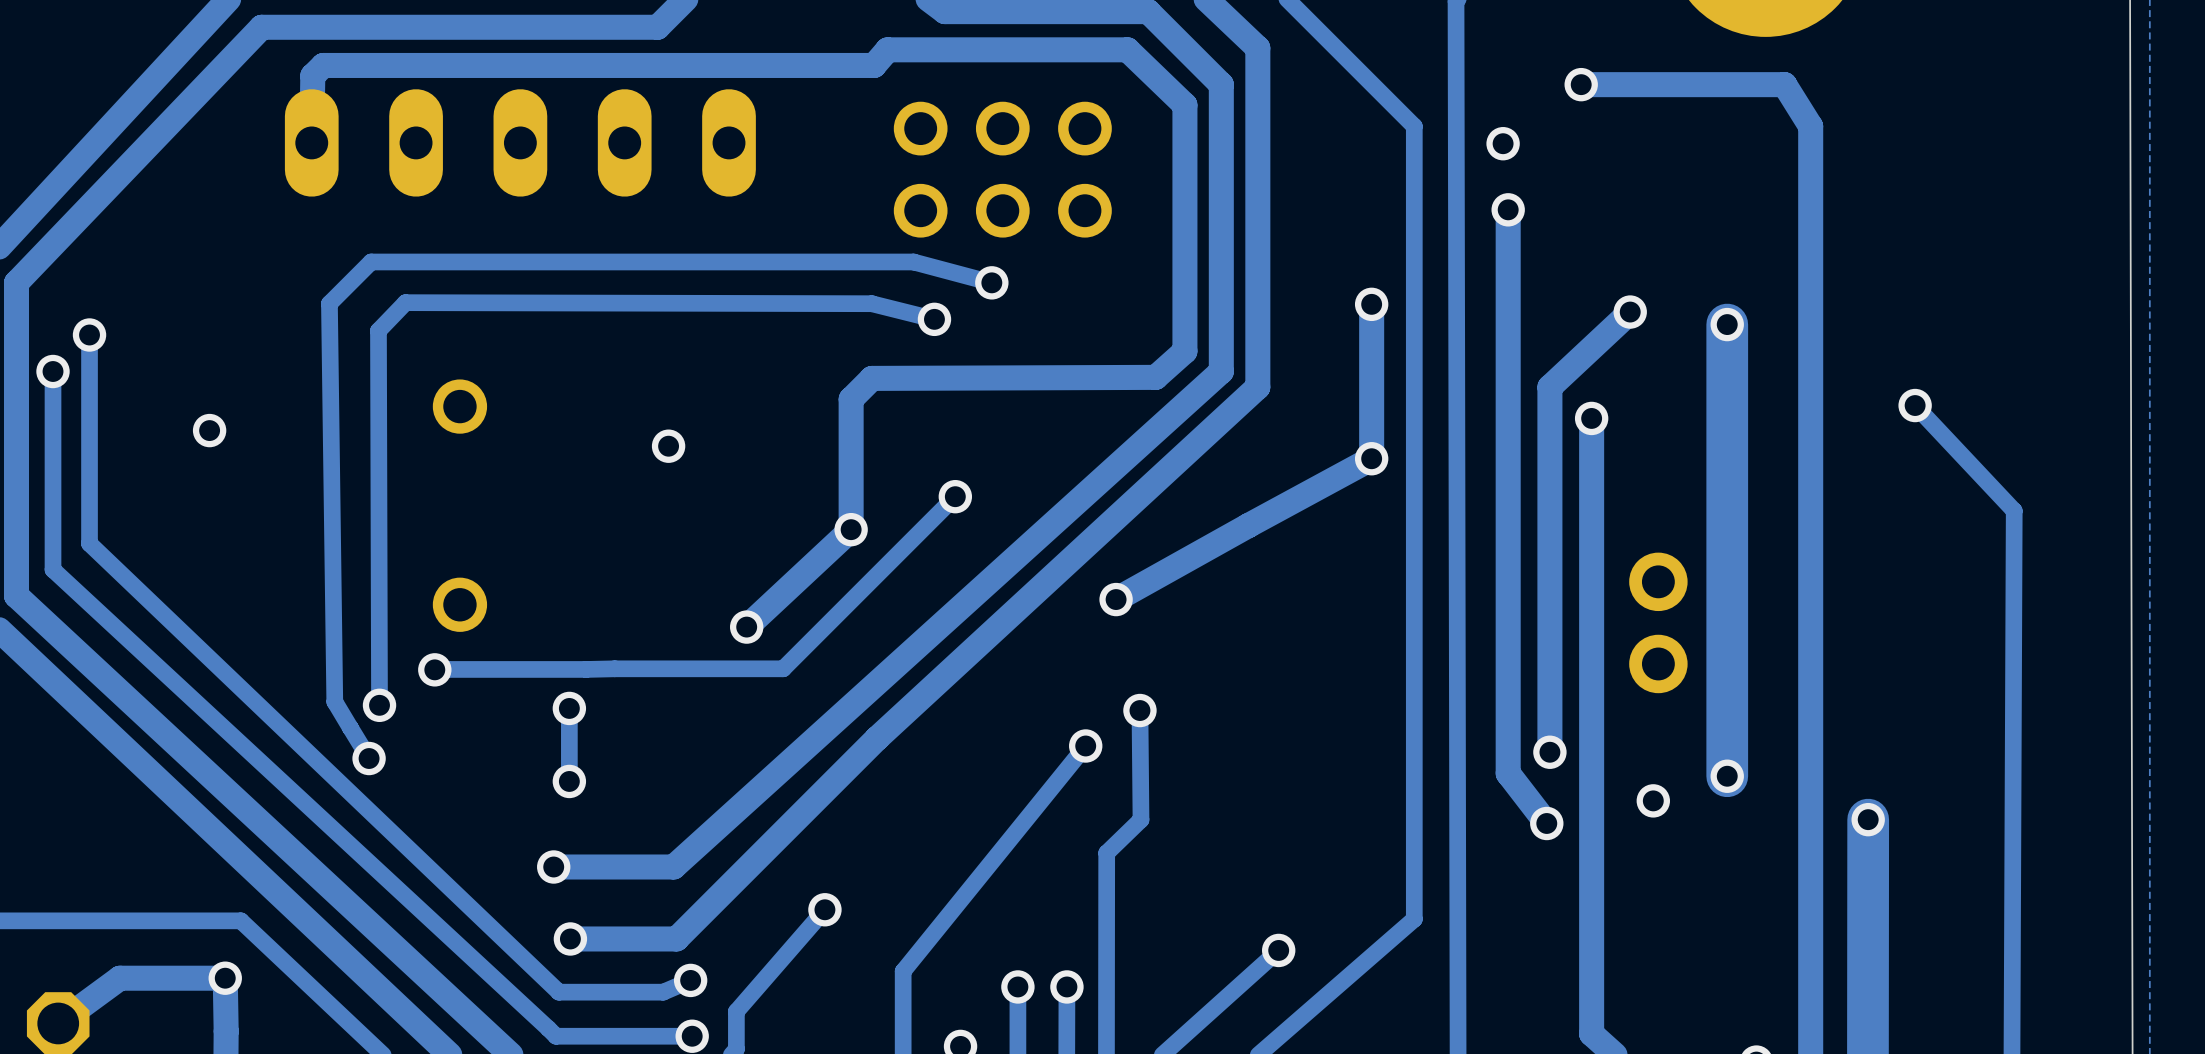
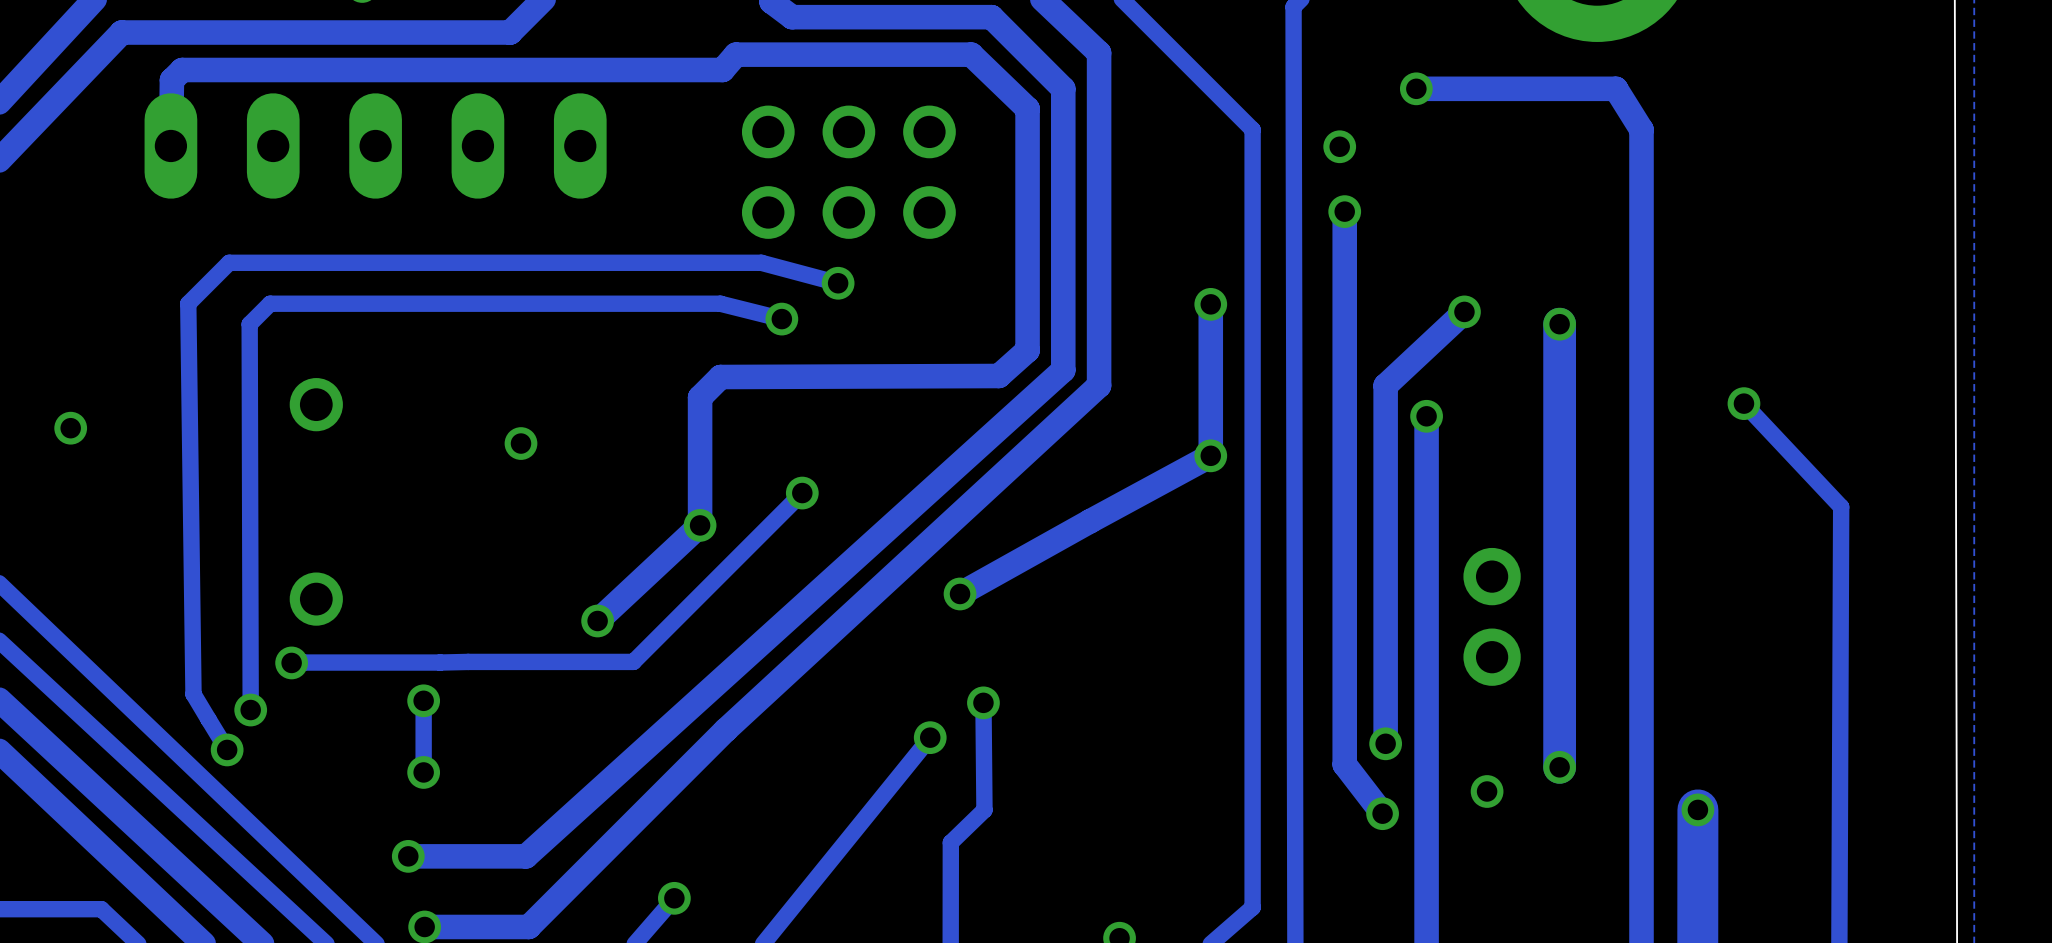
track: (871, 303) (405, 302) (378, 330) (379, 705) -> (720, 303) (270, 303) (249, 324) (250, 710)
track width: thick (1727, 324) (1727, 776) -> thin (1559, 324) (1559, 767)
via position: (379, 705) -> (250, 710)

